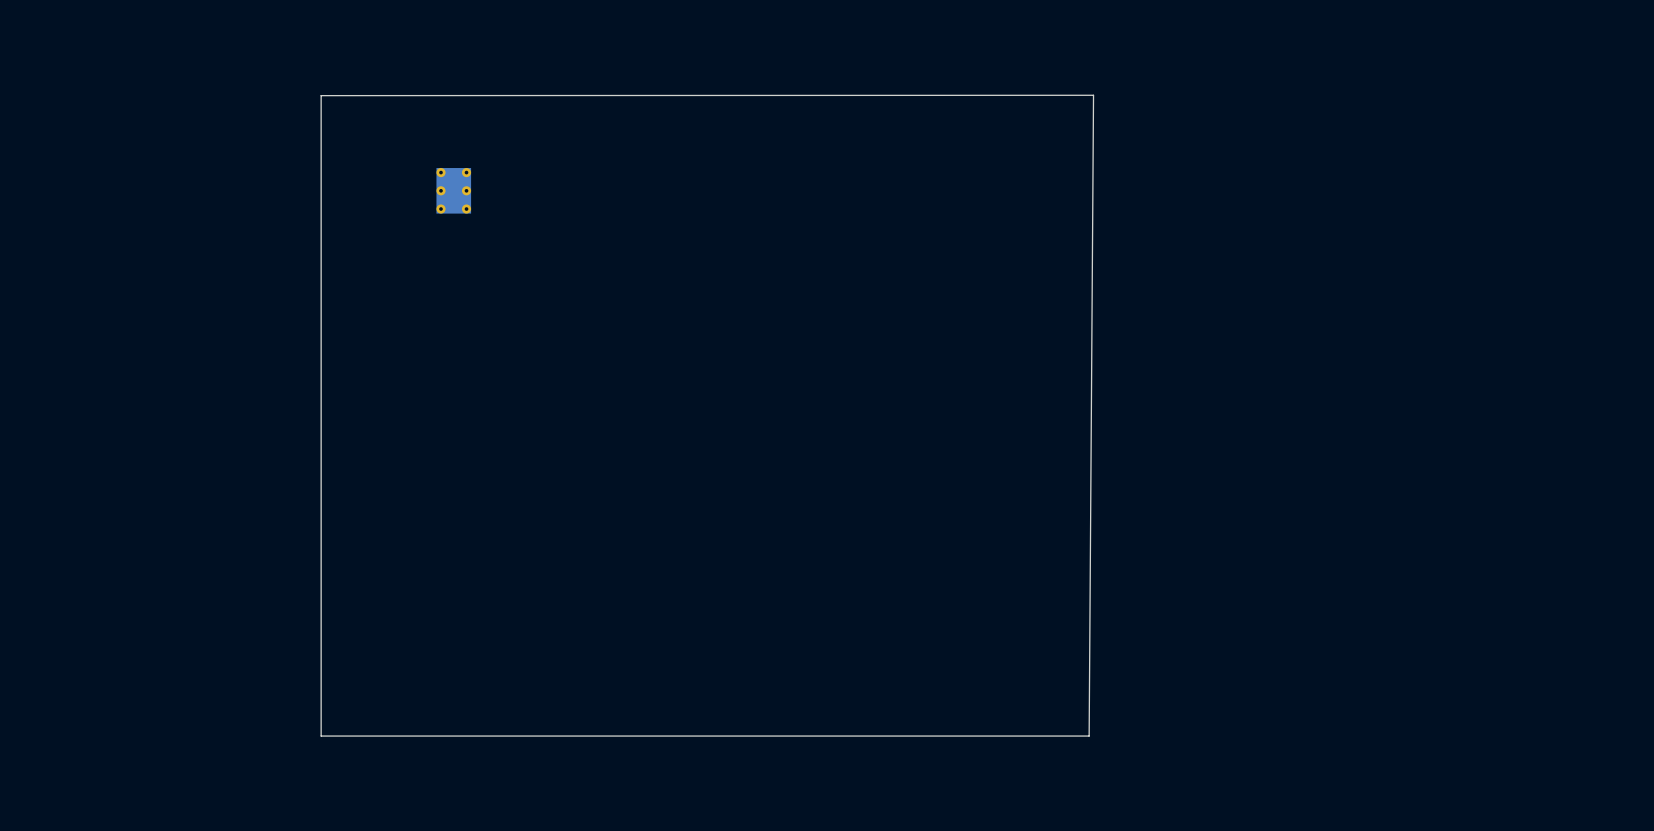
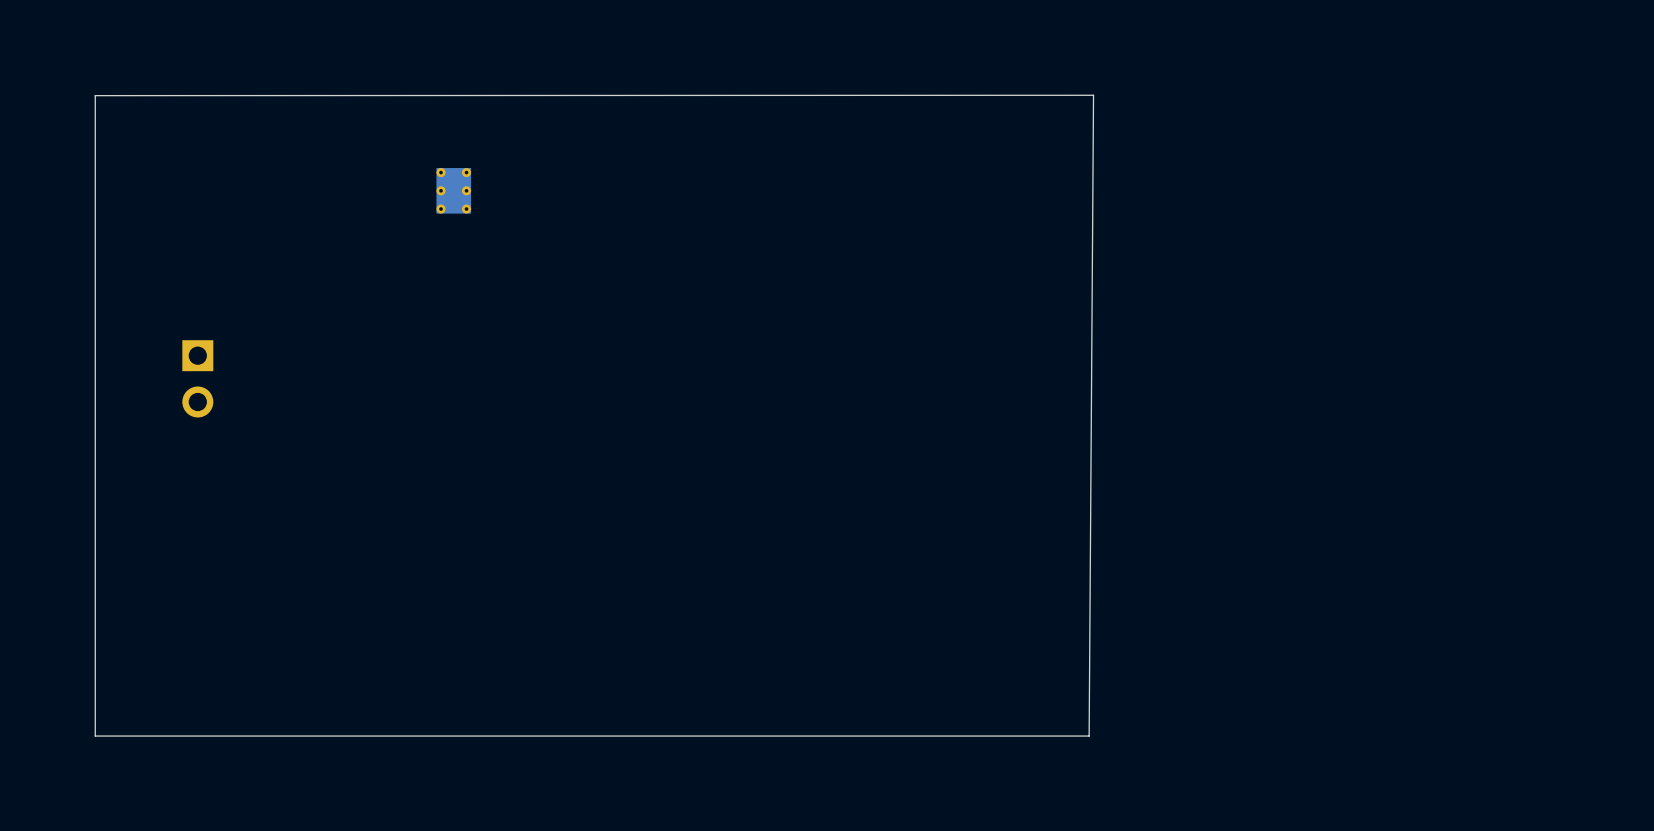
board edge: (1093, 95) (321, 95) (321, 736) -> (1093, 95) (95, 95) (95, 736) (321, 736)
part: none -> (197, 378)

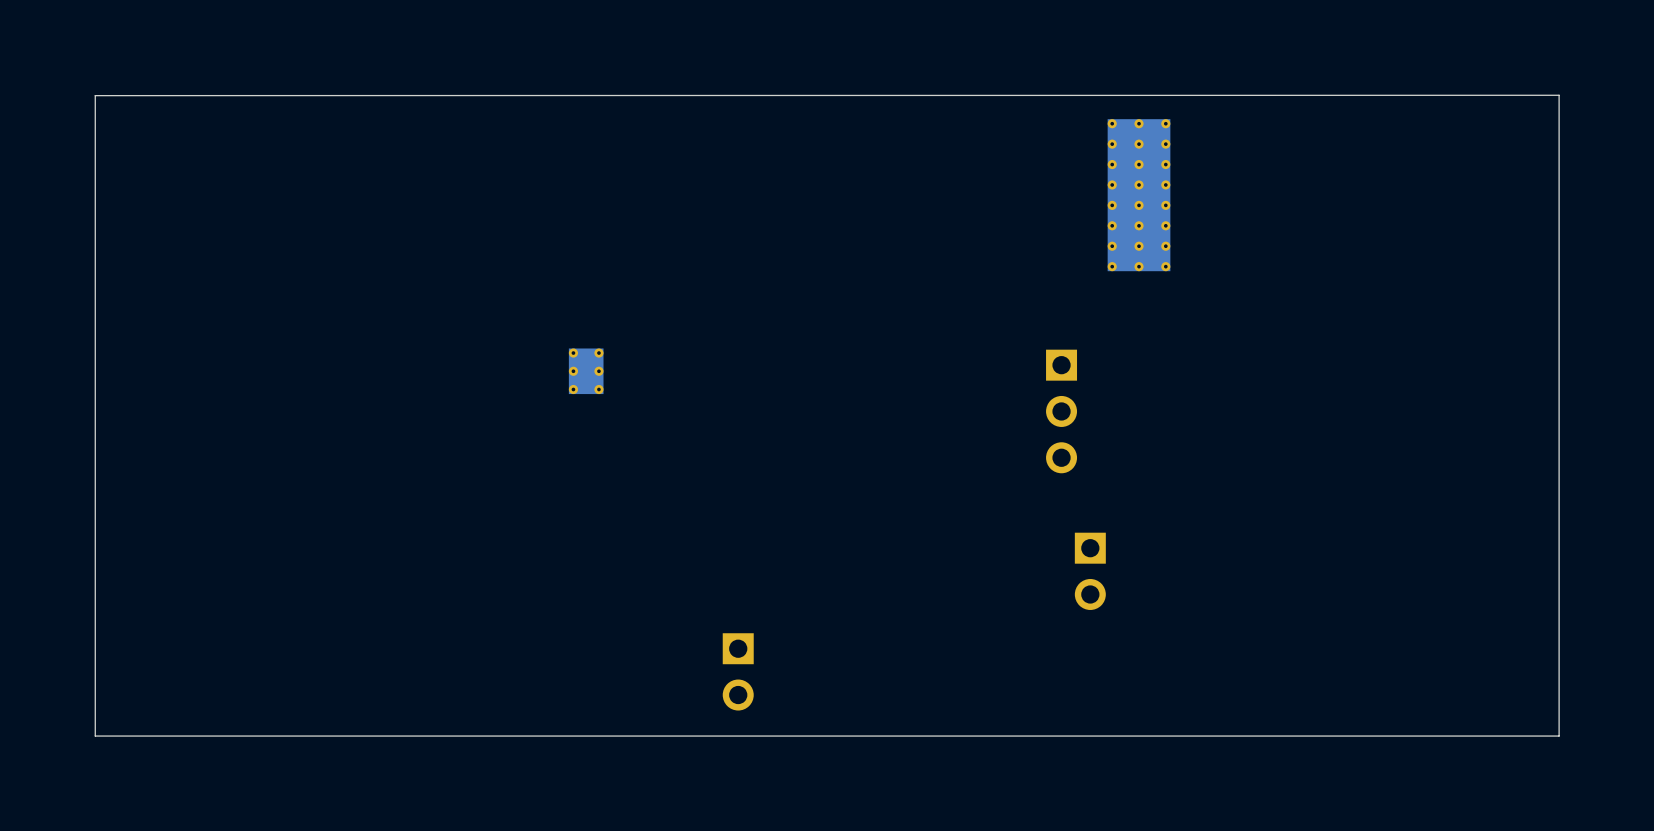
board edge: (95, 95) (1093, 95) (1089, 736) -> (95, 95) (1559, 95) (1559, 736) (1089, 736)
part position: (453, 190) -> (586, 371)
part: none -> (1139, 195)
part: (197, 378) -> none
part: none -> (1061, 411)
part: none -> (1090, 571)
part: none -> (738, 671)

